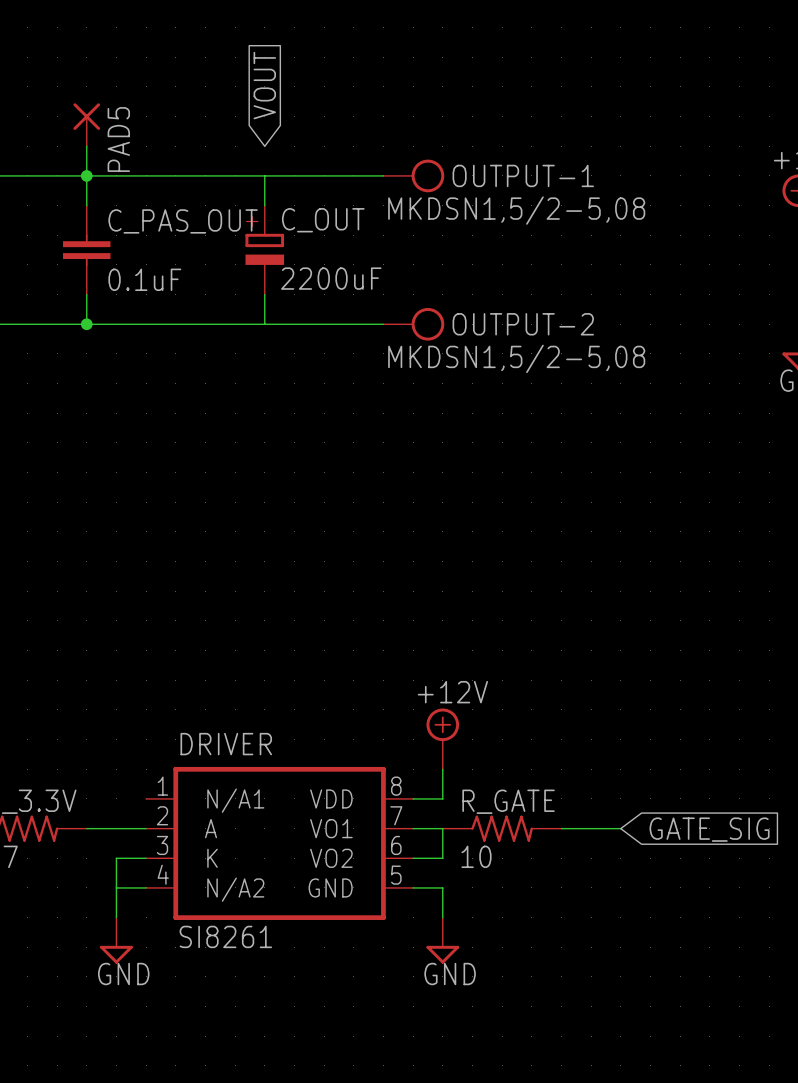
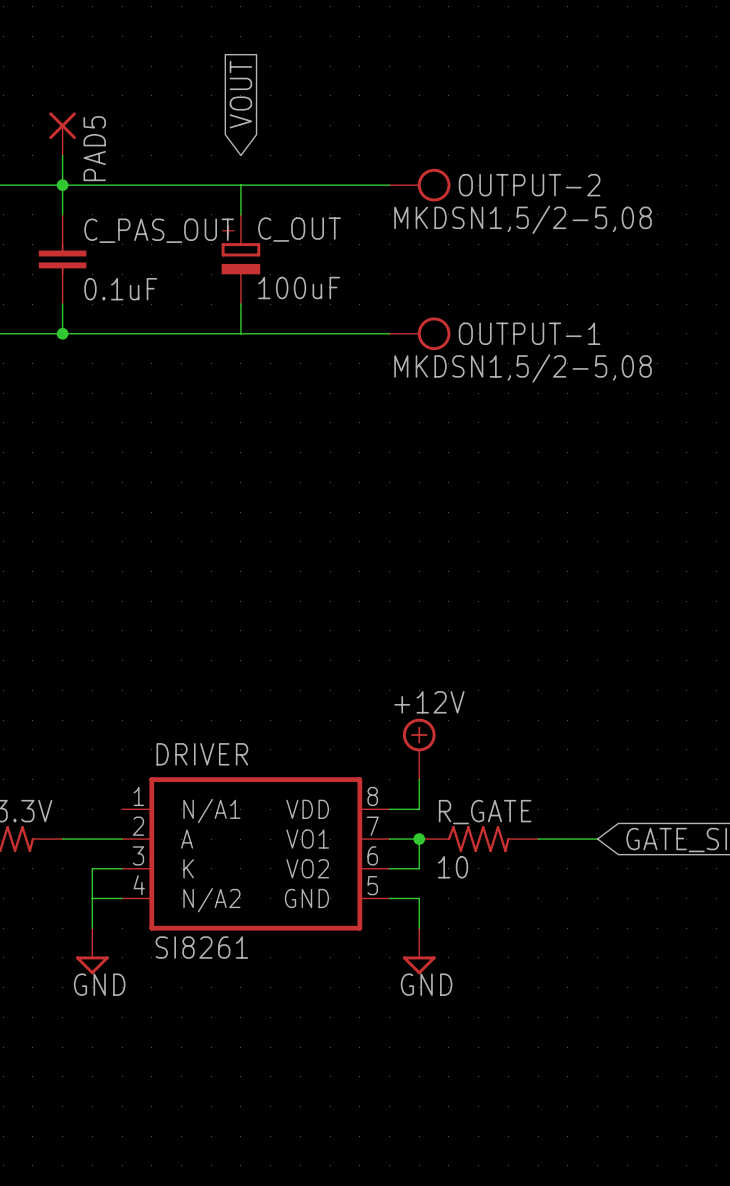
OUTPUT-1 position: (413, 175) -> (420, 333)
C_OUT value: 2200uF (331, 278) -> 100uF (299, 287)
OUTPUT-2 position: (413, 324) -> (420, 185)
junction: none -> (419, 839)

